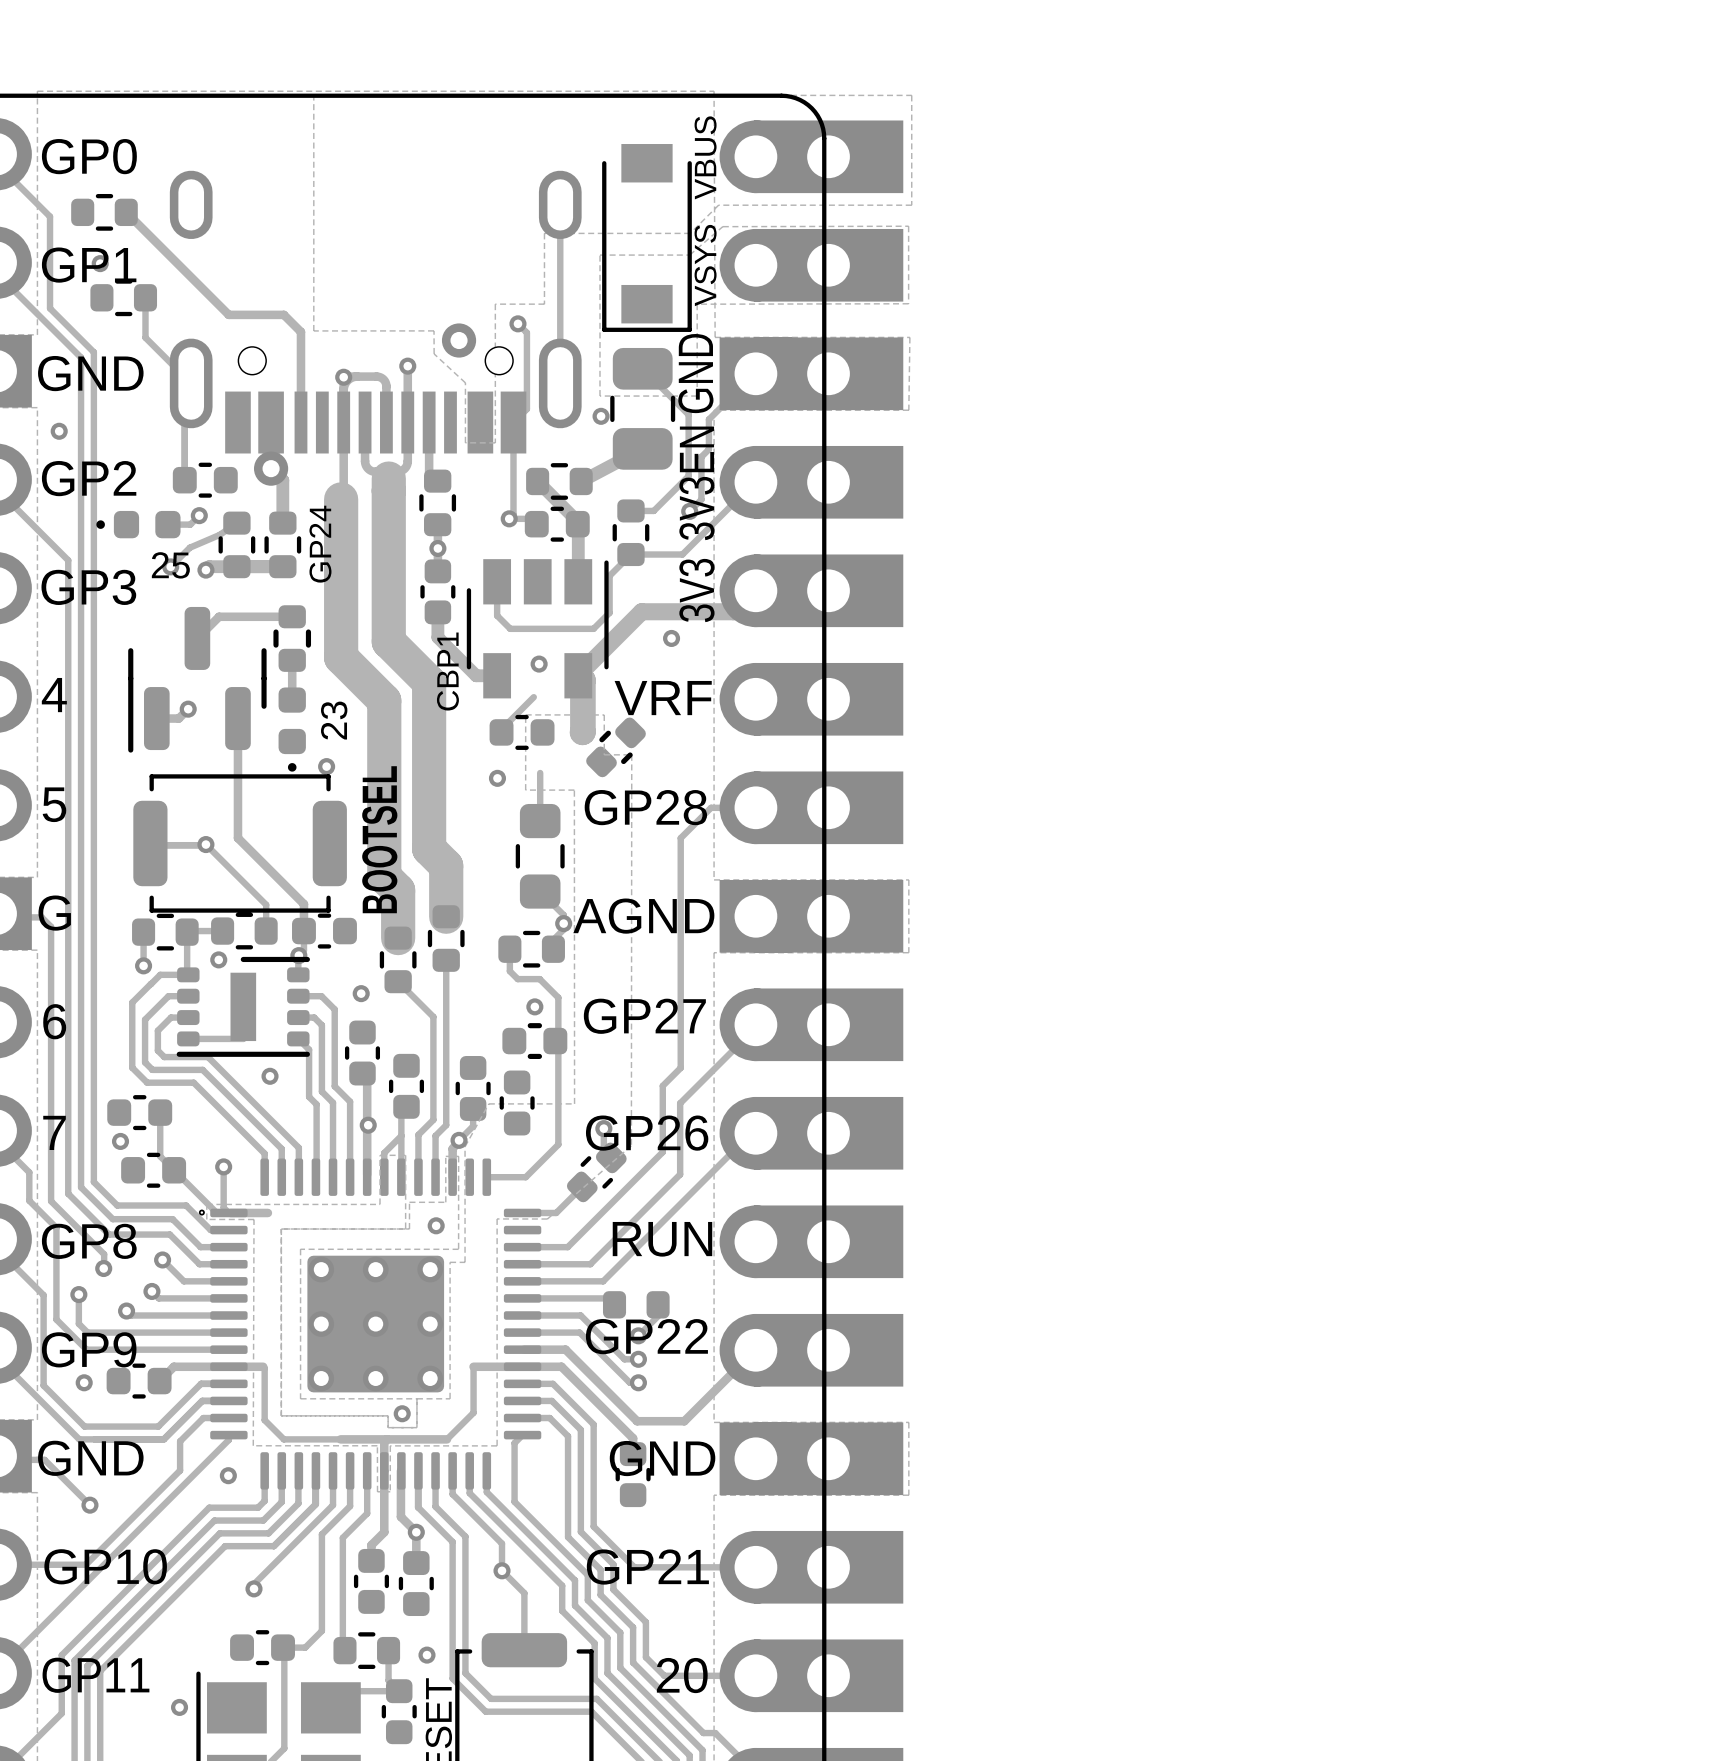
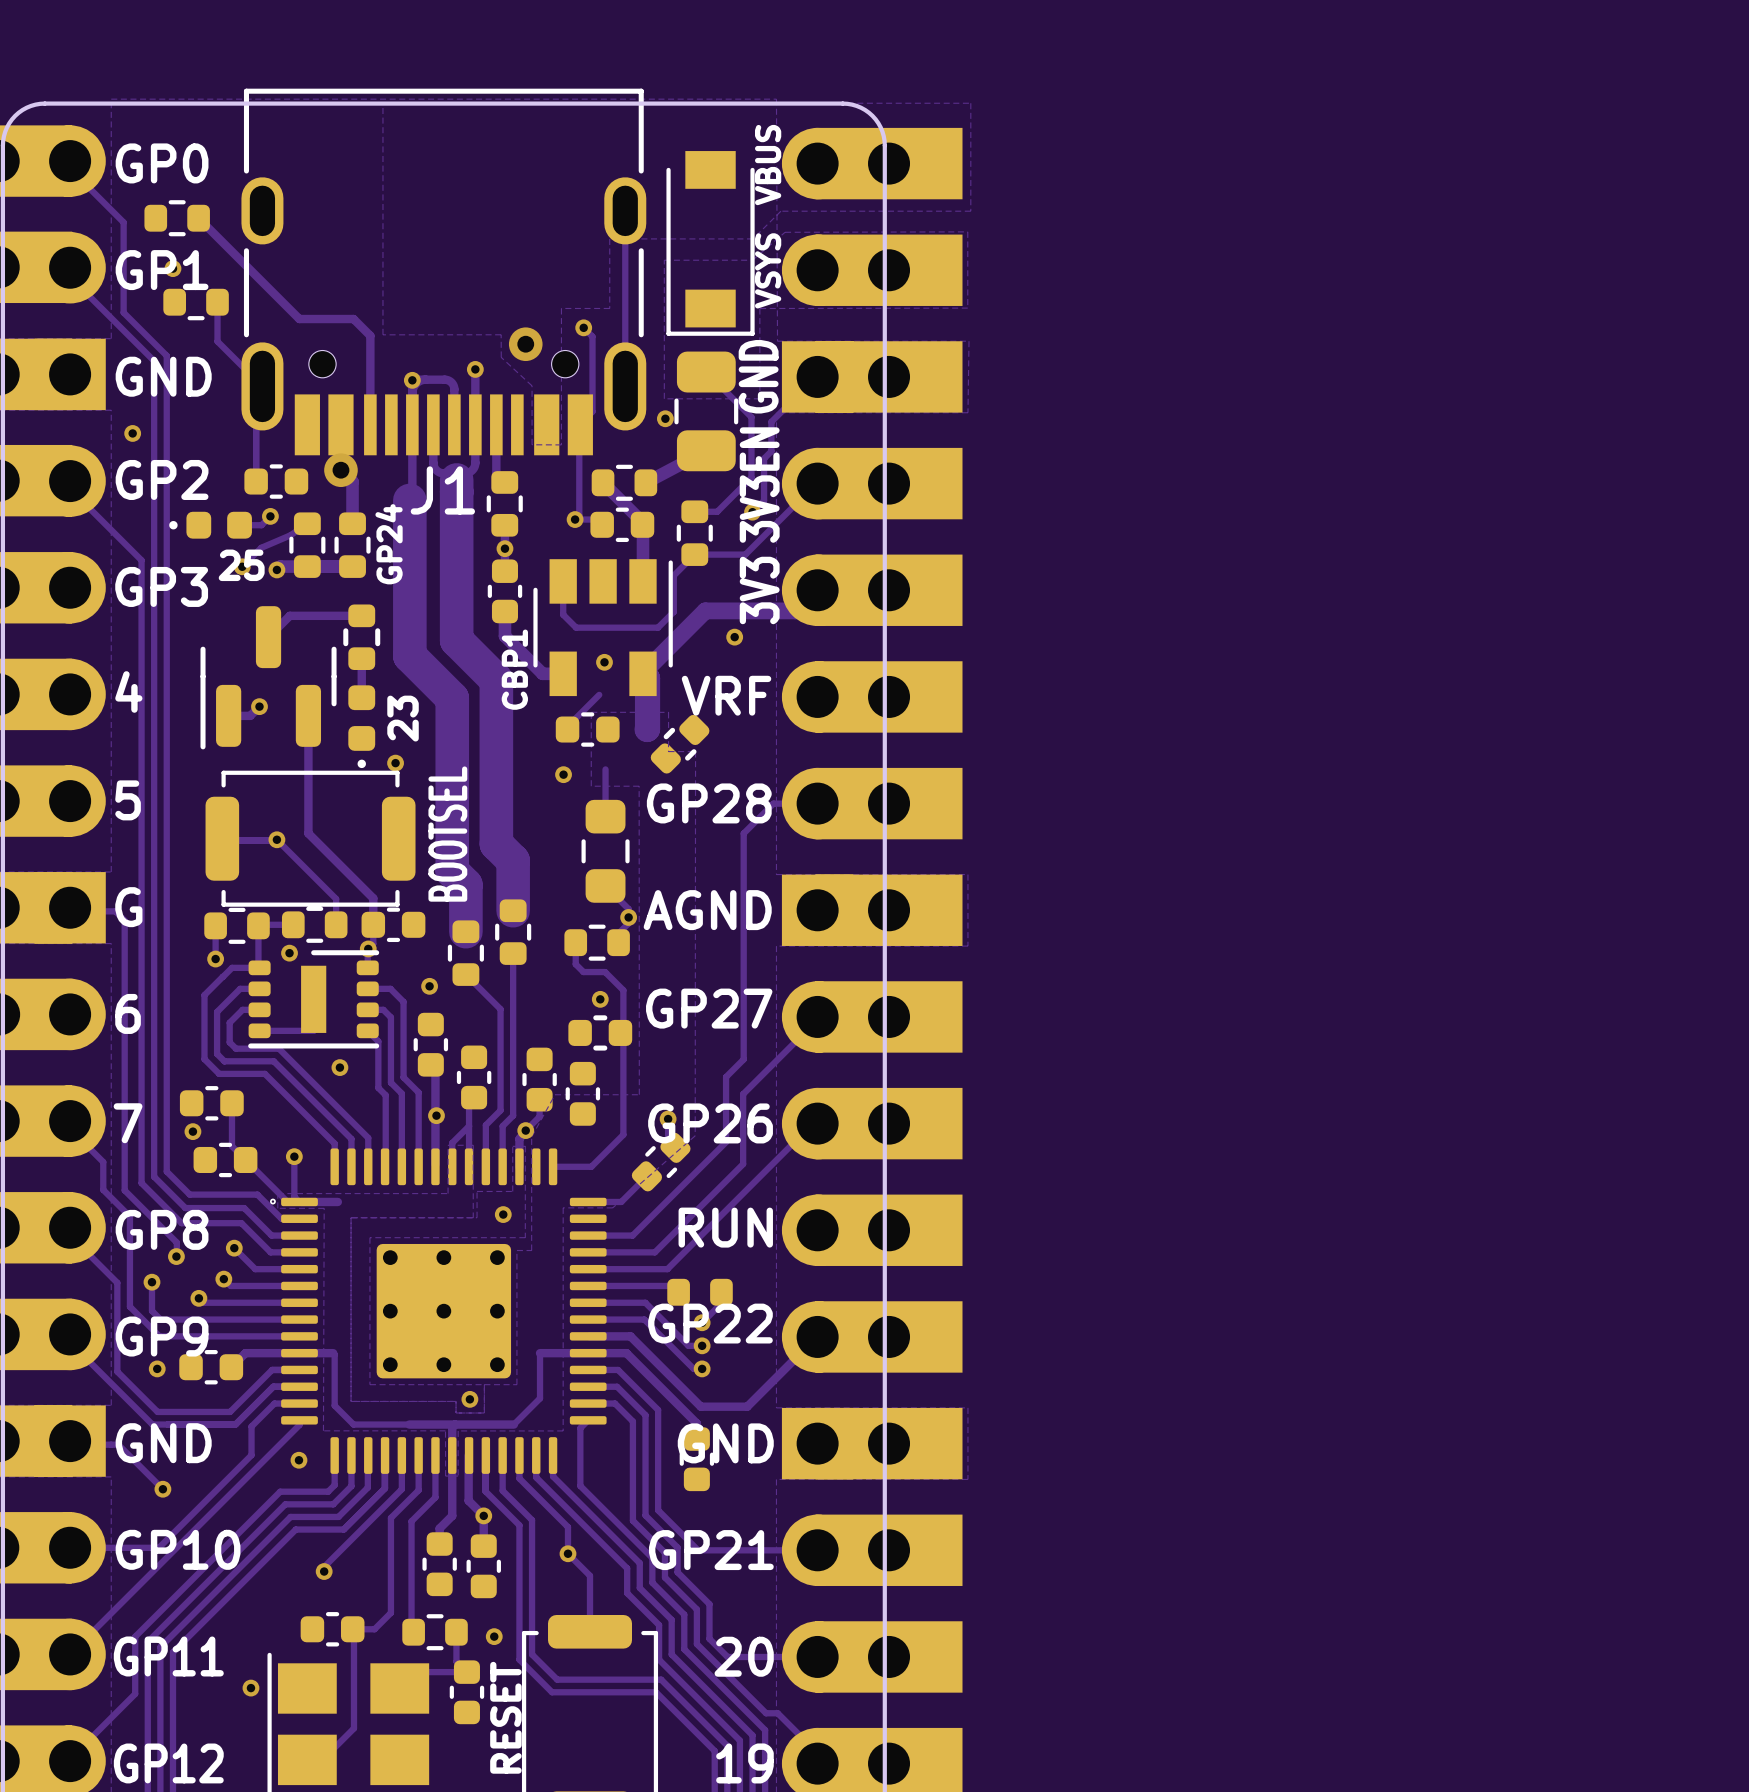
J1: none -> (443, 271)
part: (375, 312) -> none

